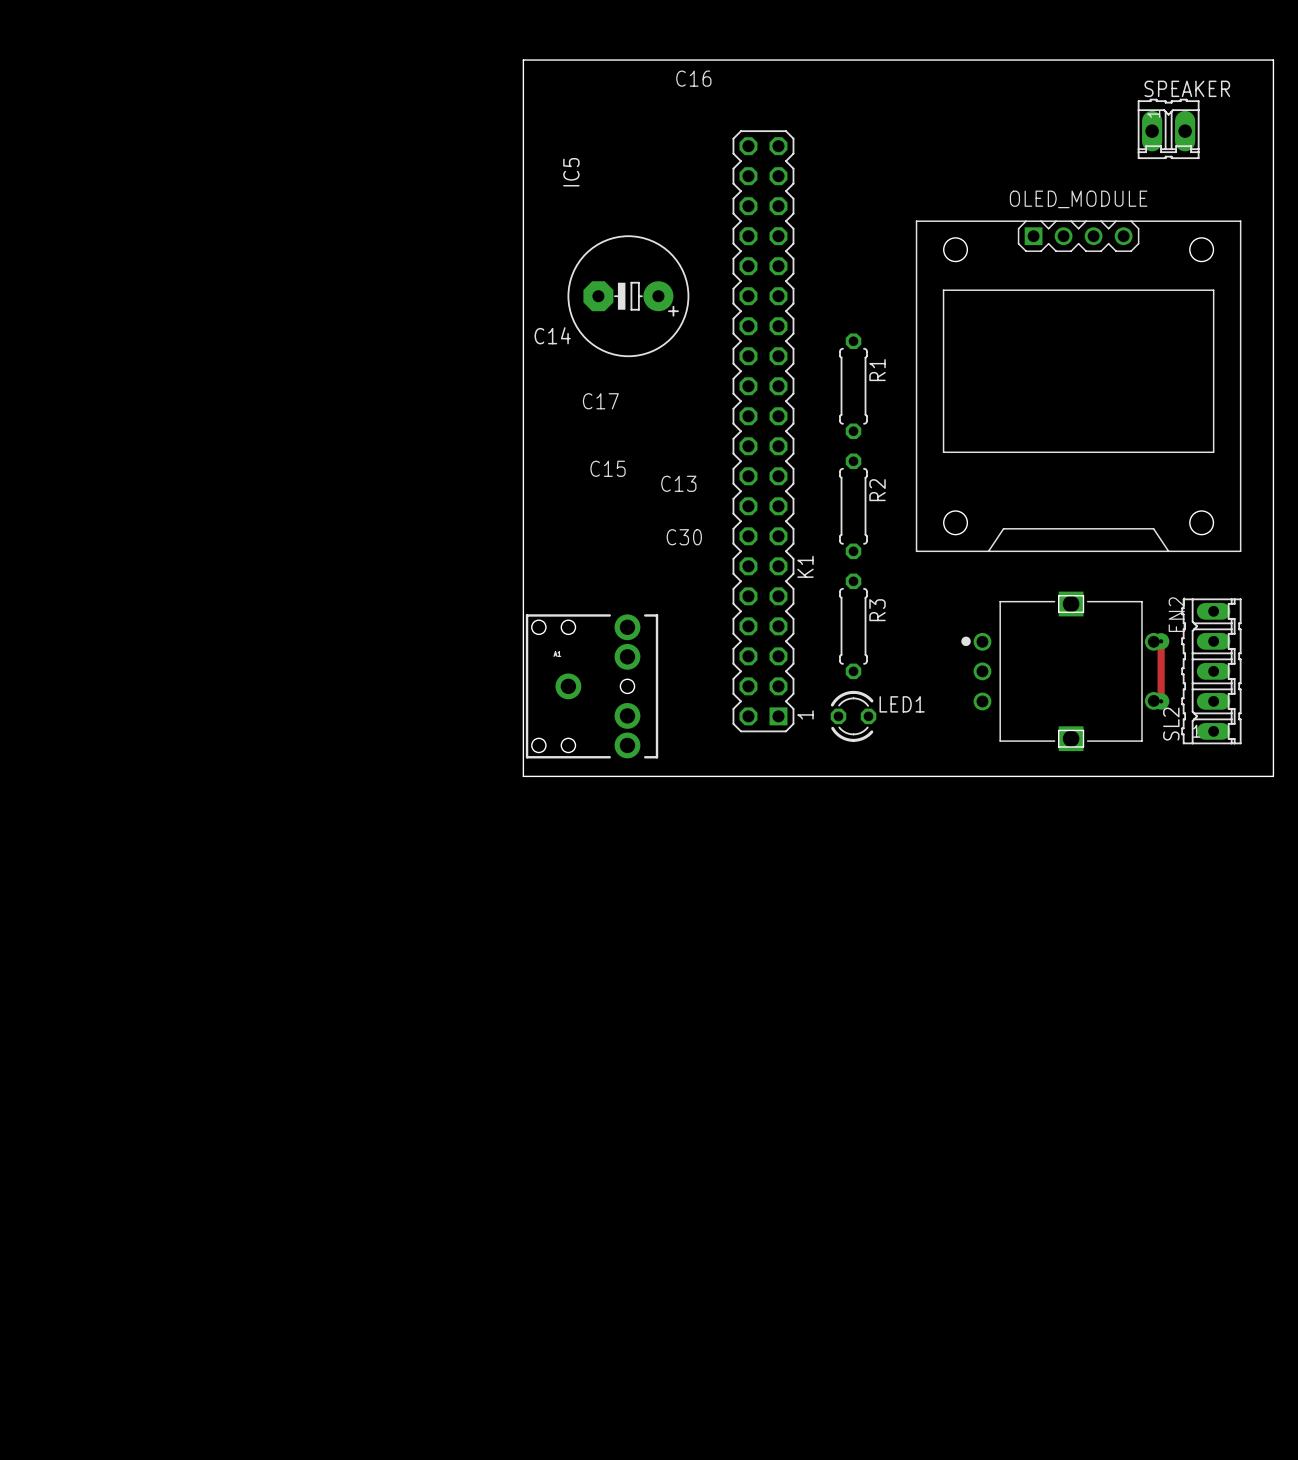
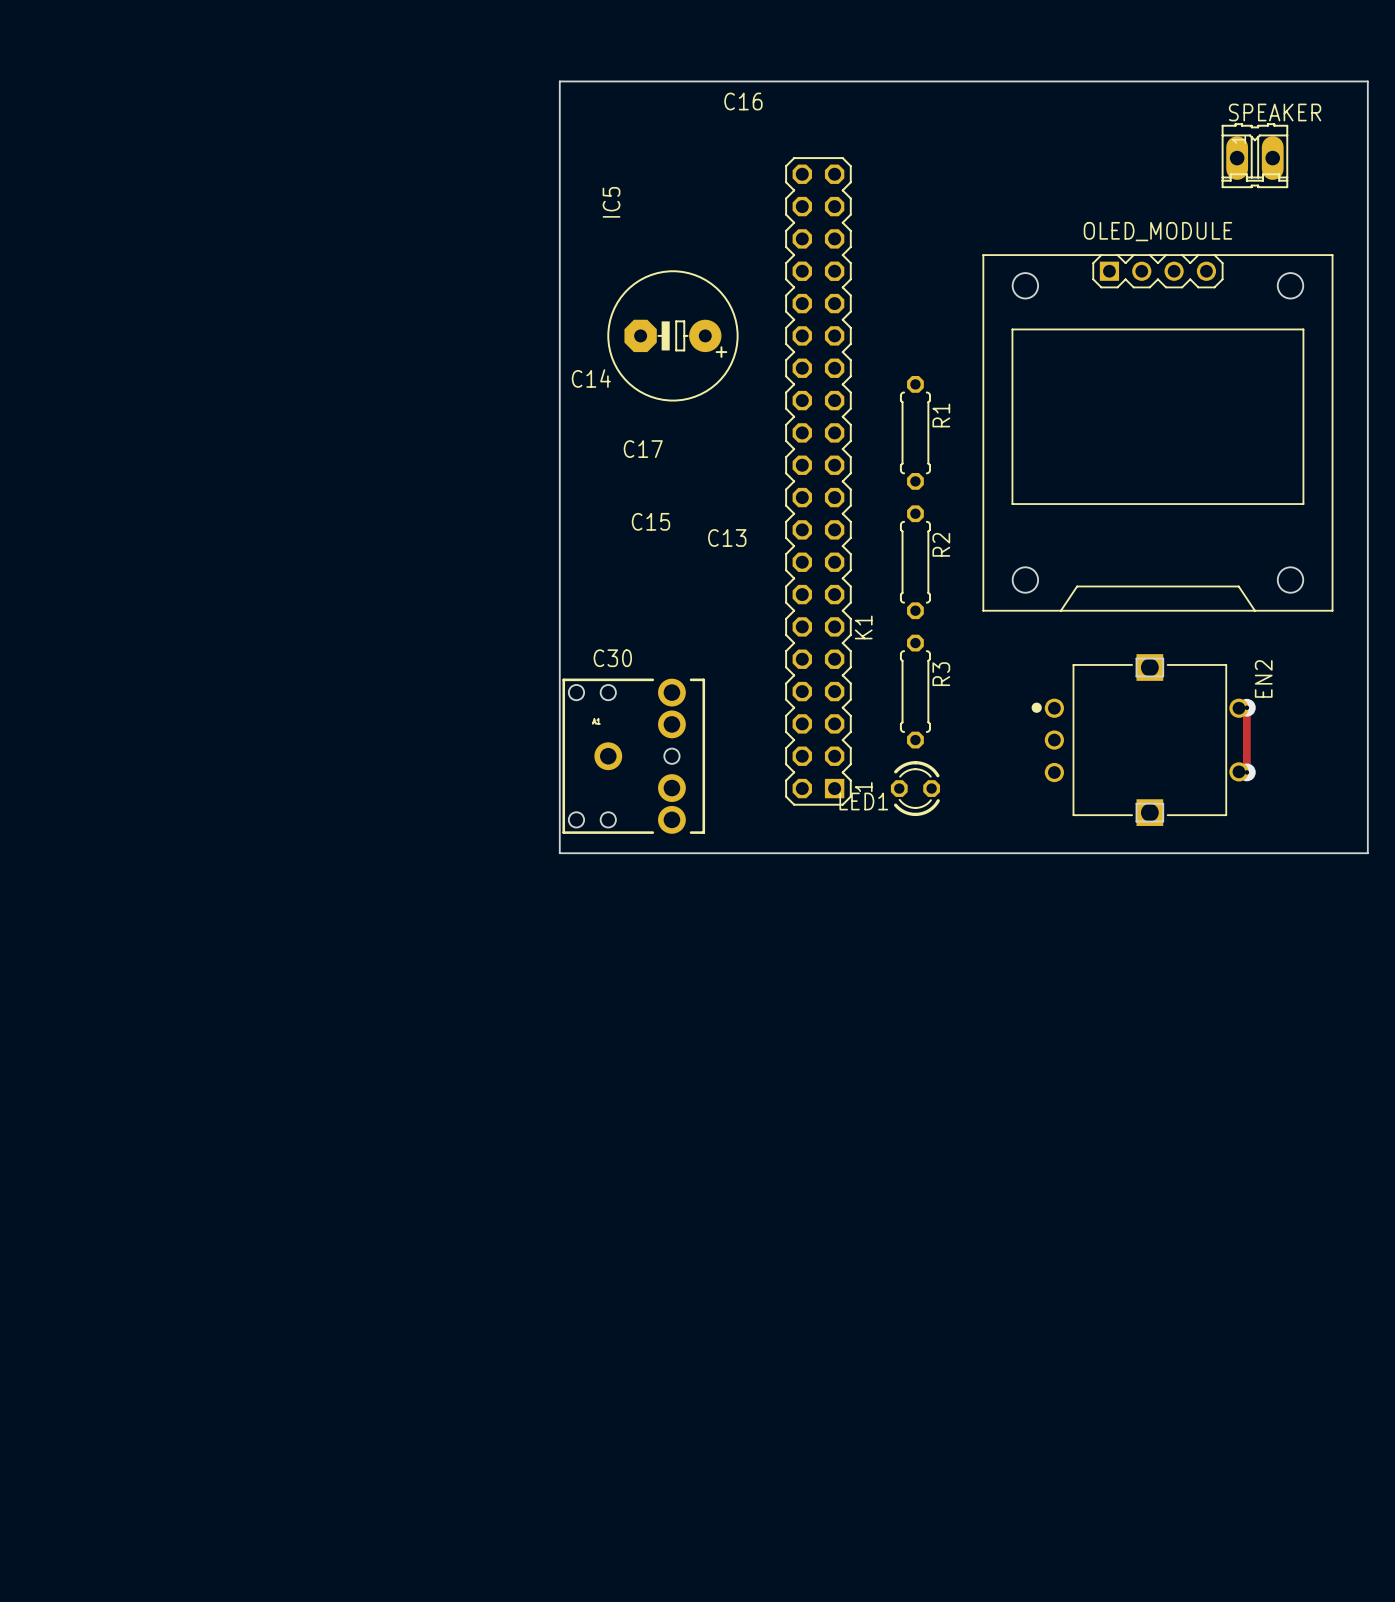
C30 position: (684, 537) -> (612, 658)
SL2: (1211, 671) -> none
LED1 rotation: 0° (853, 716) -> 180° (915, 788)

